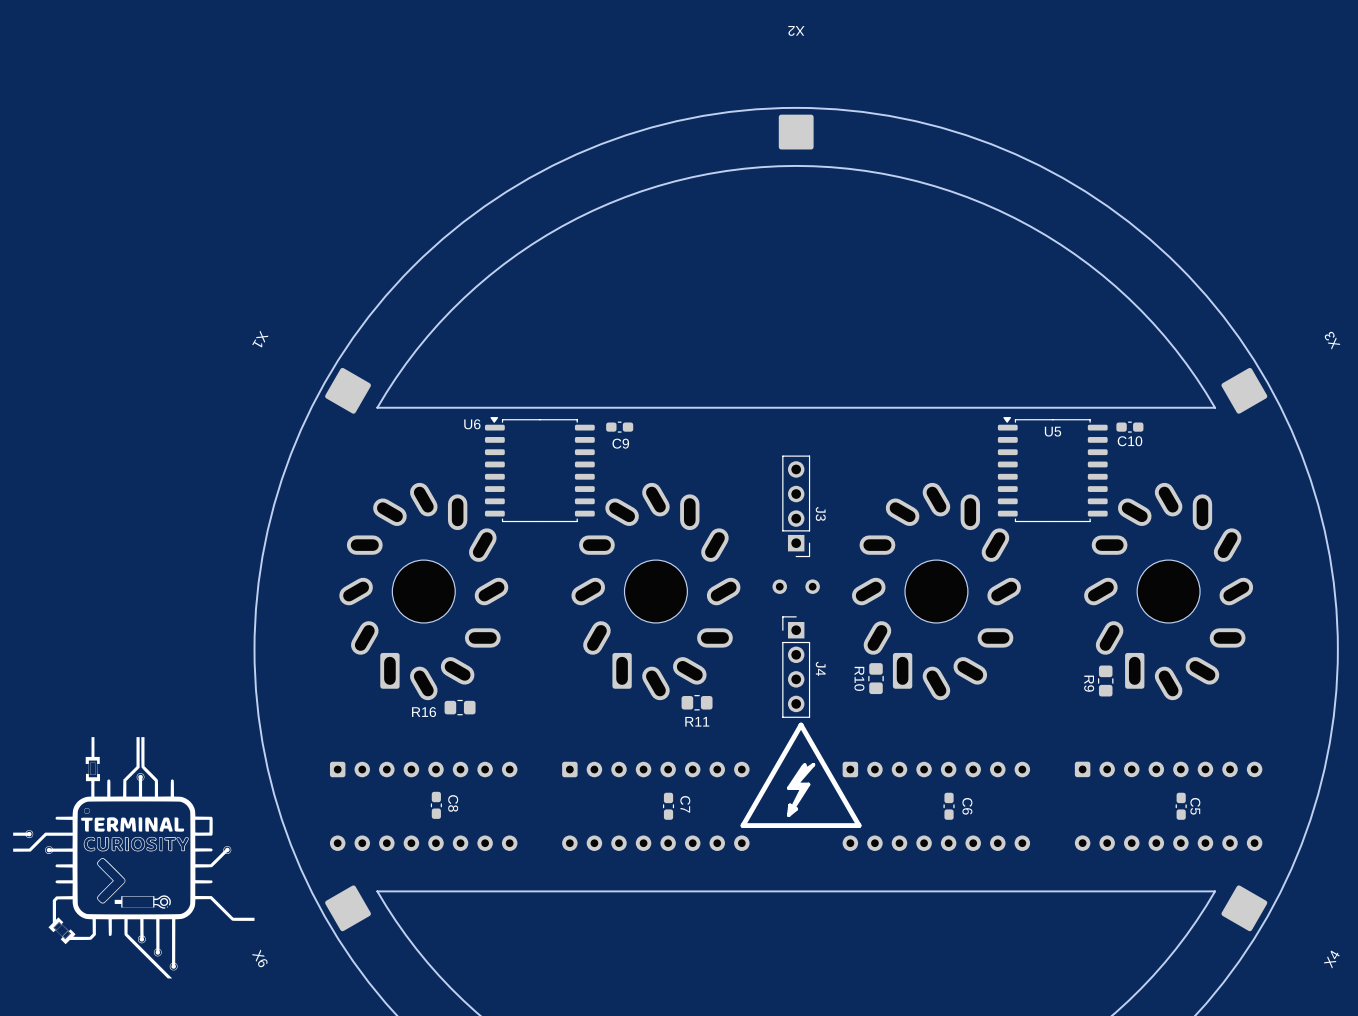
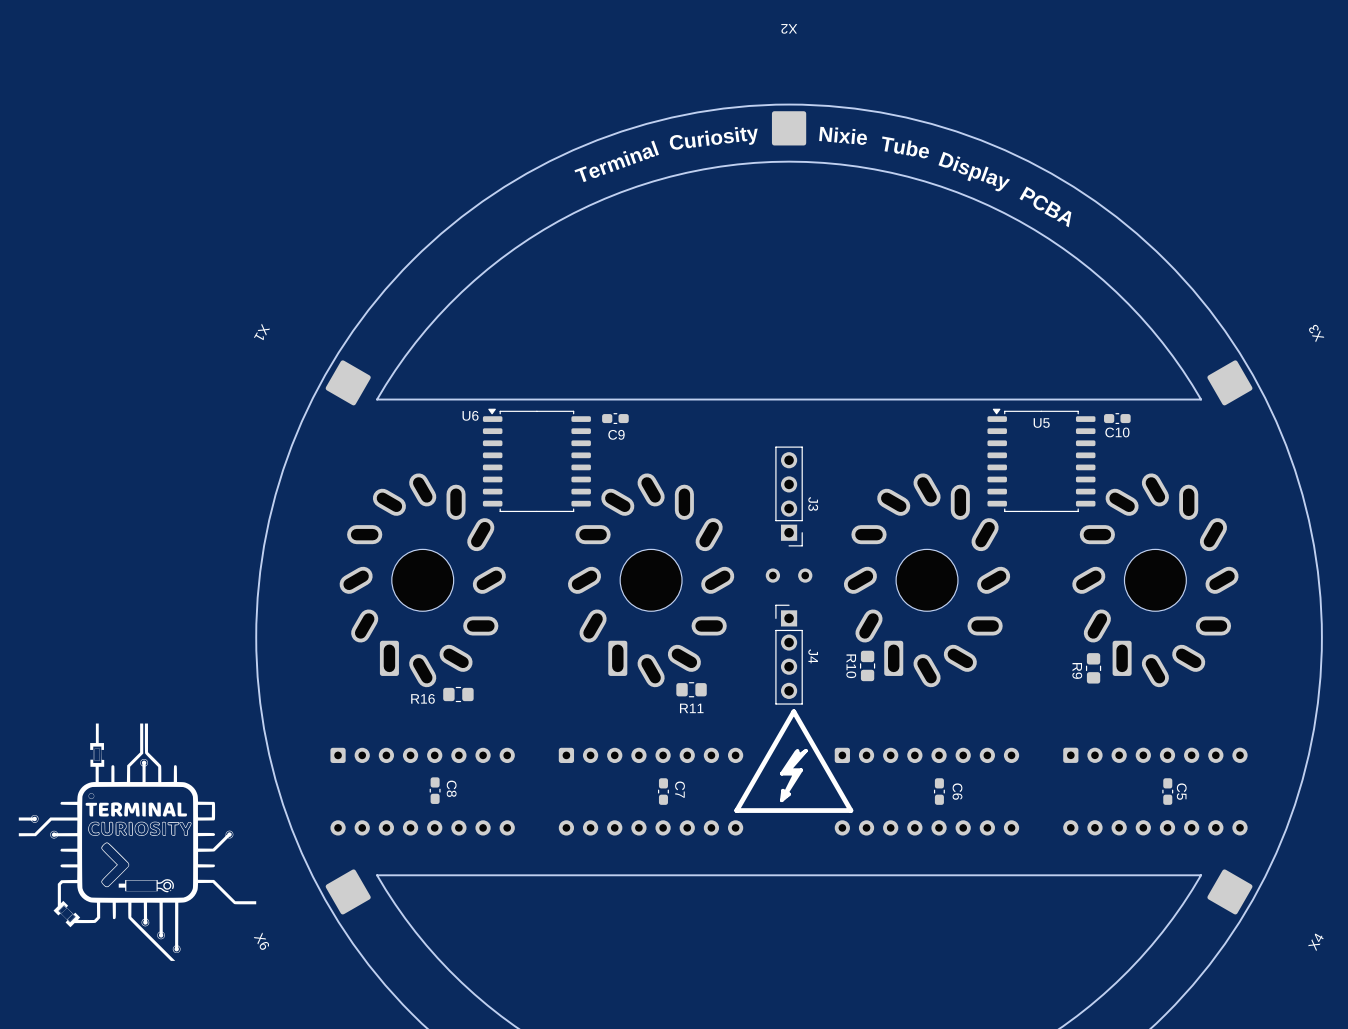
text: none -> Nixie (843, 136)
text: none -> Curiosity (713, 138)
text: none -> Tube (905, 147)
text: none -> Terminal (616, 161)
text: none -> Display (974, 171)
text: none -> PCBA (1045, 206)

